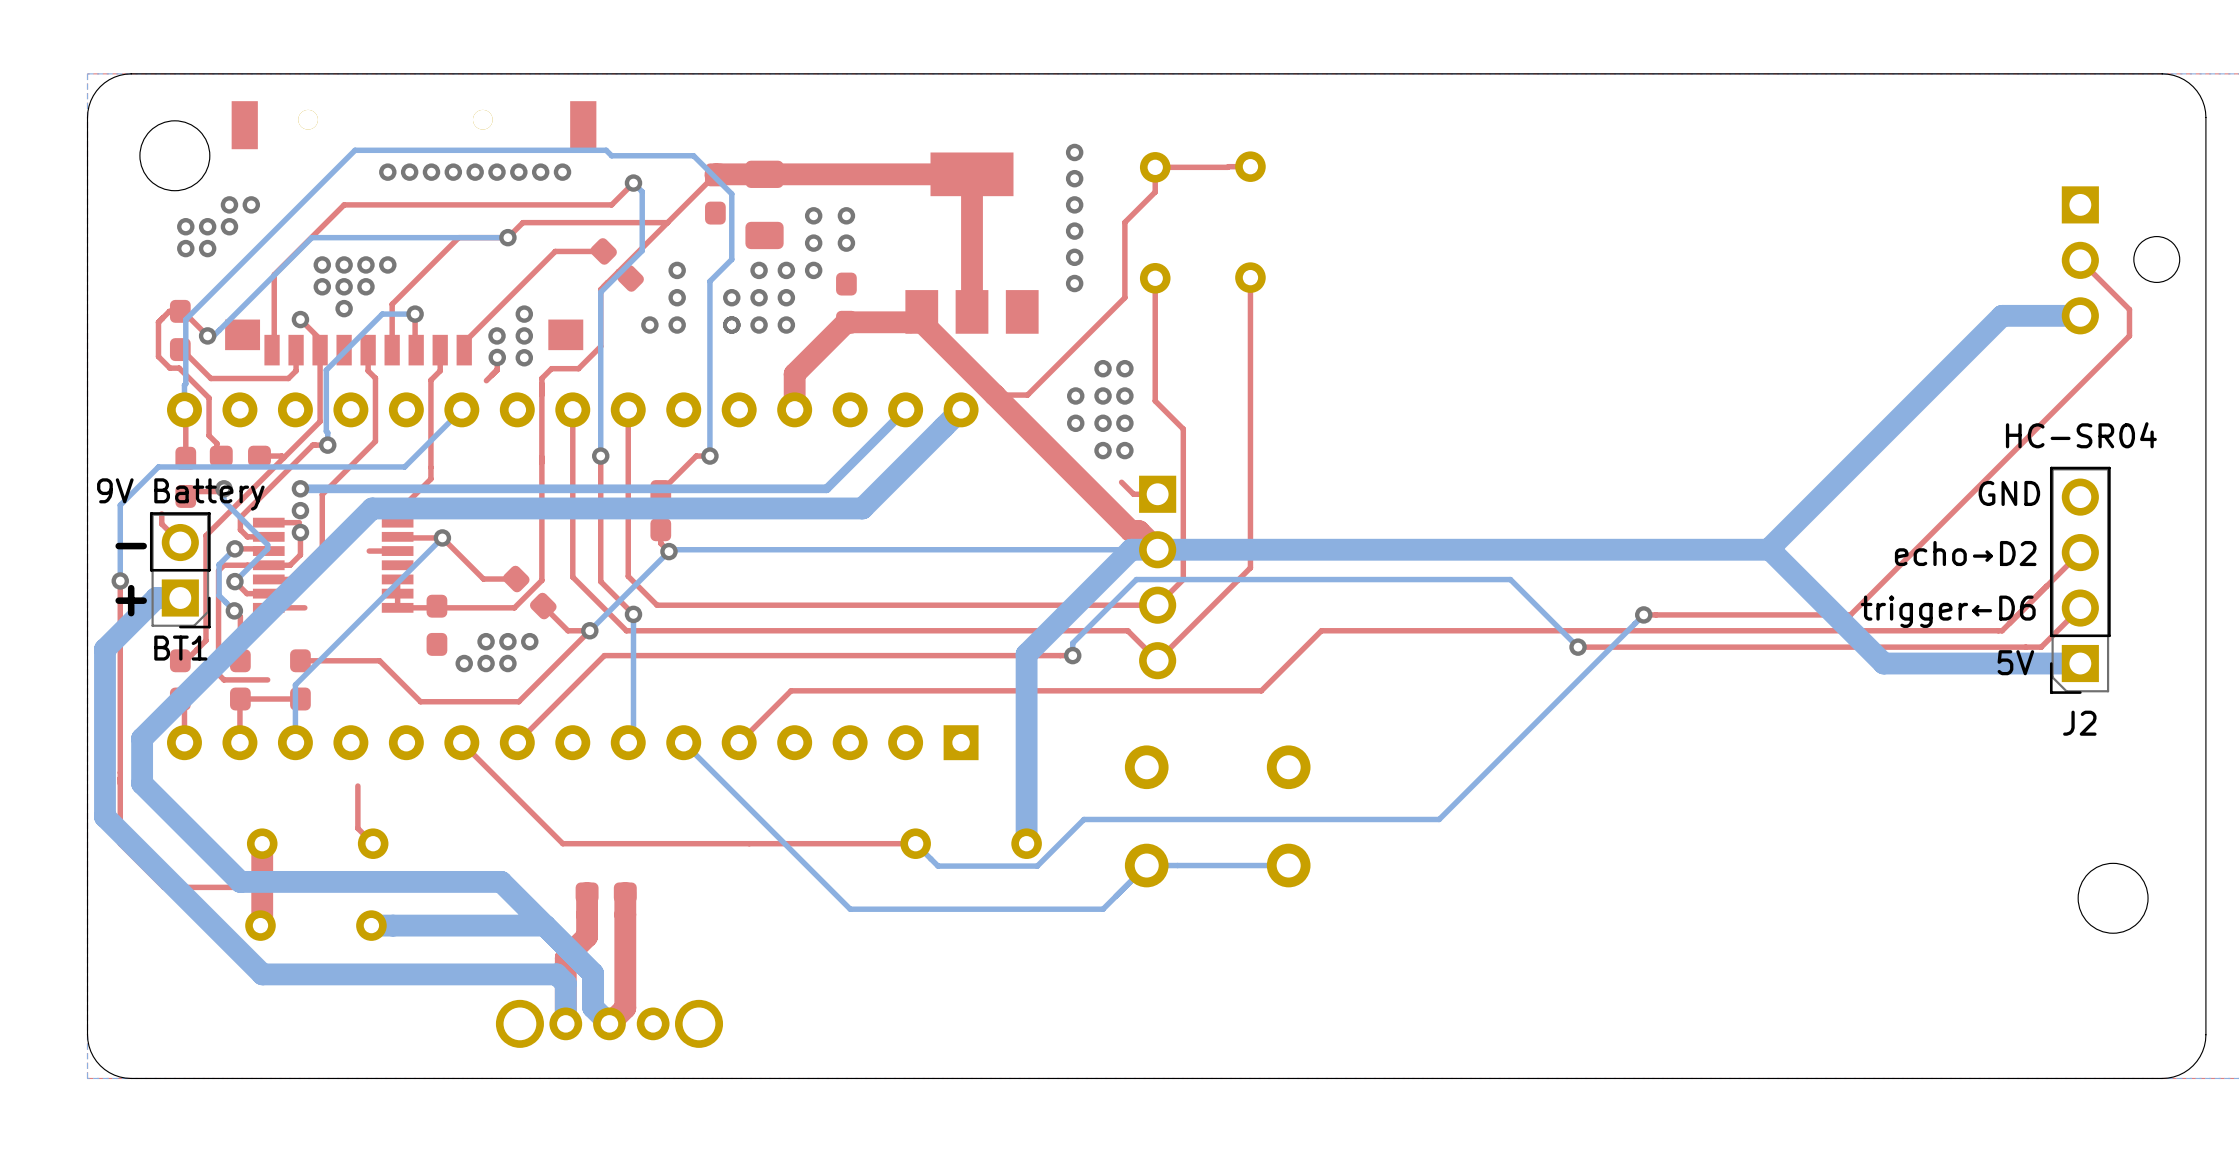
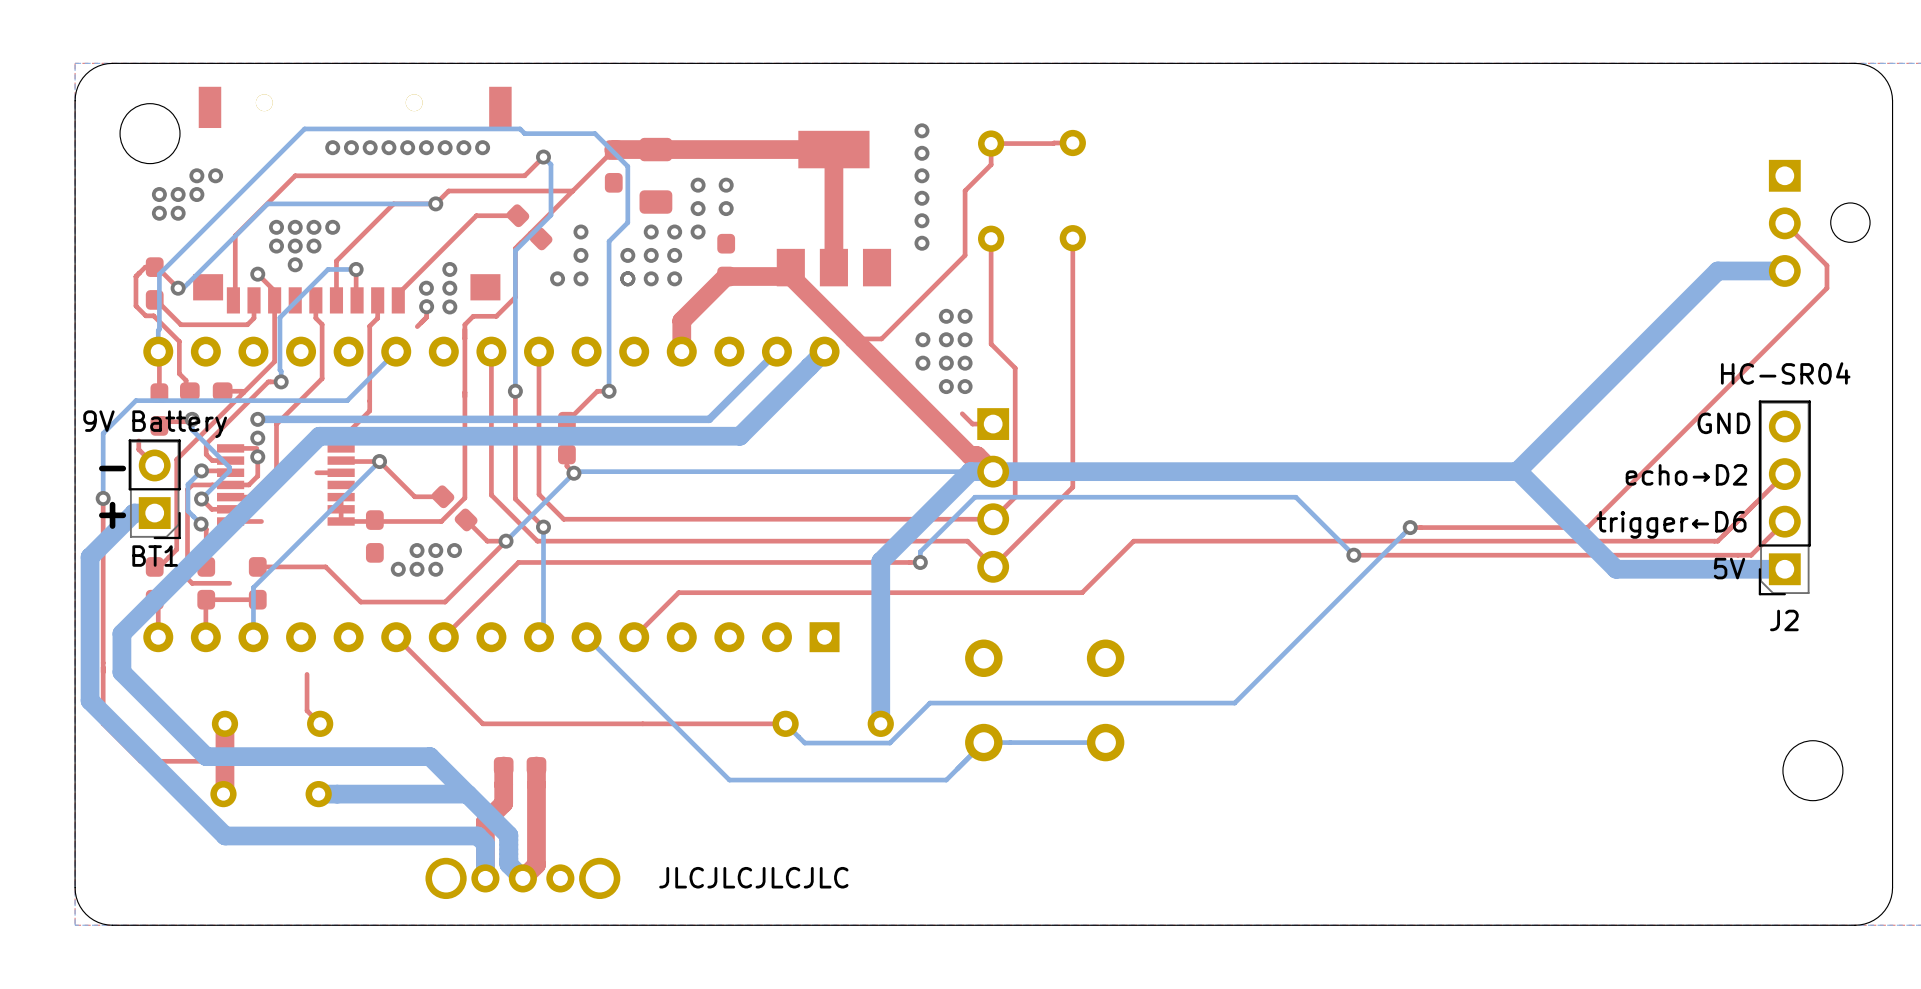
text: none -> JLCJLCJLCJLC (753, 877)

